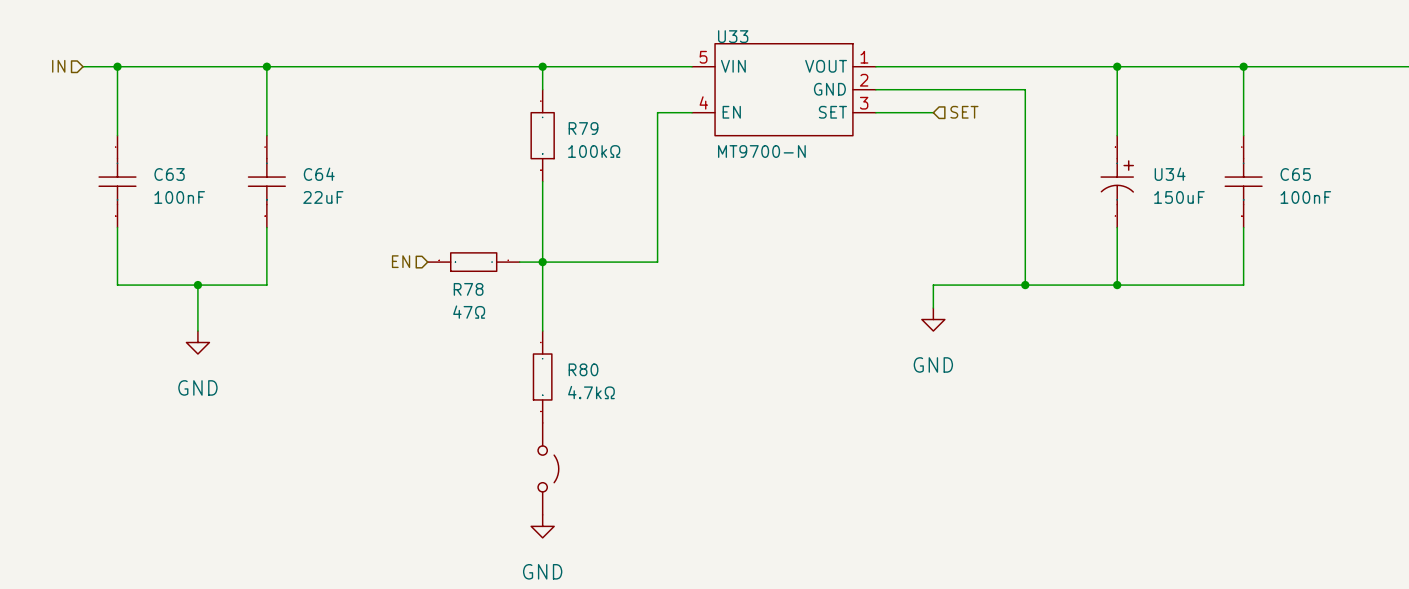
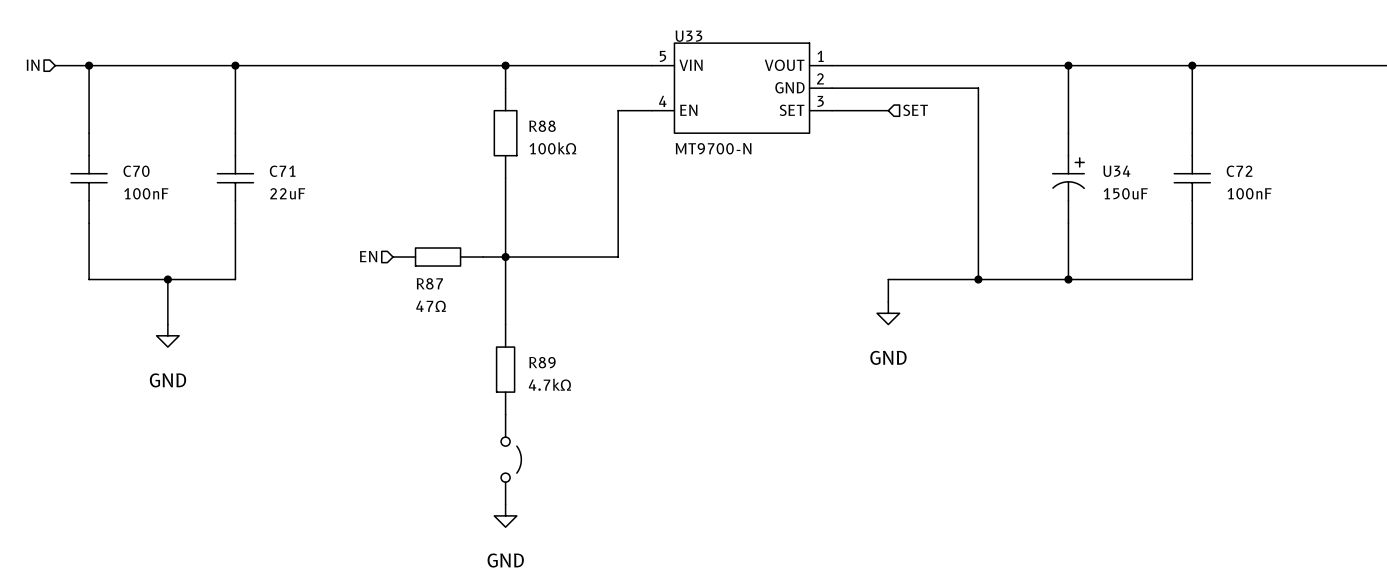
R79 name: R79 (583, 128) -> R88 (542, 126)
C63 name: C63 (169, 174) -> C70 (136, 171)
C64 name: C64 (319, 174) -> C71 (282, 171)
C65 name: C65 (1295, 174) -> C72 (1239, 171)
R78 name: R78 (468, 289) -> R87 (429, 283)
R80 name: R80 (583, 369) -> R89 (542, 362)

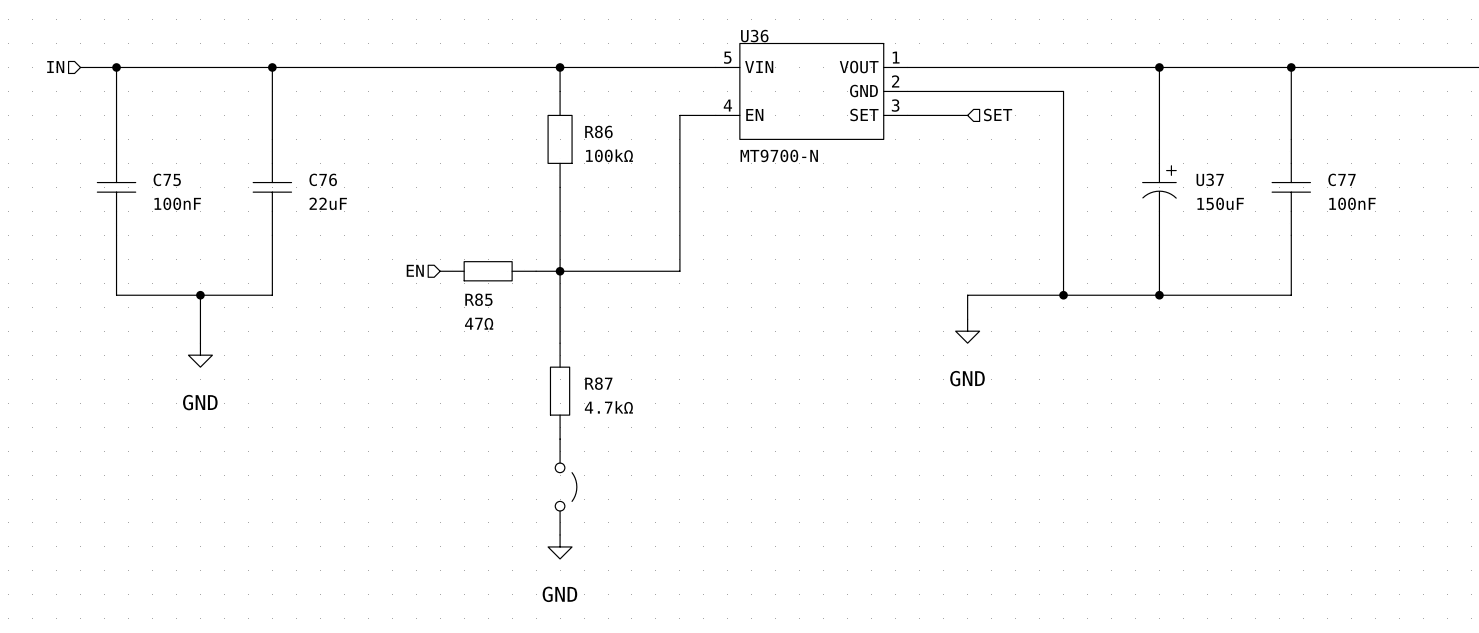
U33 name: U33 (688, 36) -> U36 (754, 36)
R88 name: R88 (542, 126) -> R86 (598, 131)
C70 name: C70 (136, 171) -> C75 (167, 179)
C71 name: C71 (282, 171) -> C76 (323, 179)
U34 name: U34 (1116, 171) -> U37 (1210, 179)
C72 name: C72 (1239, 171) -> C77 (1342, 179)
R87 name: R87 (429, 283) -> R85 (478, 299)
R89 name: R89 (542, 362) -> R87 (598, 383)

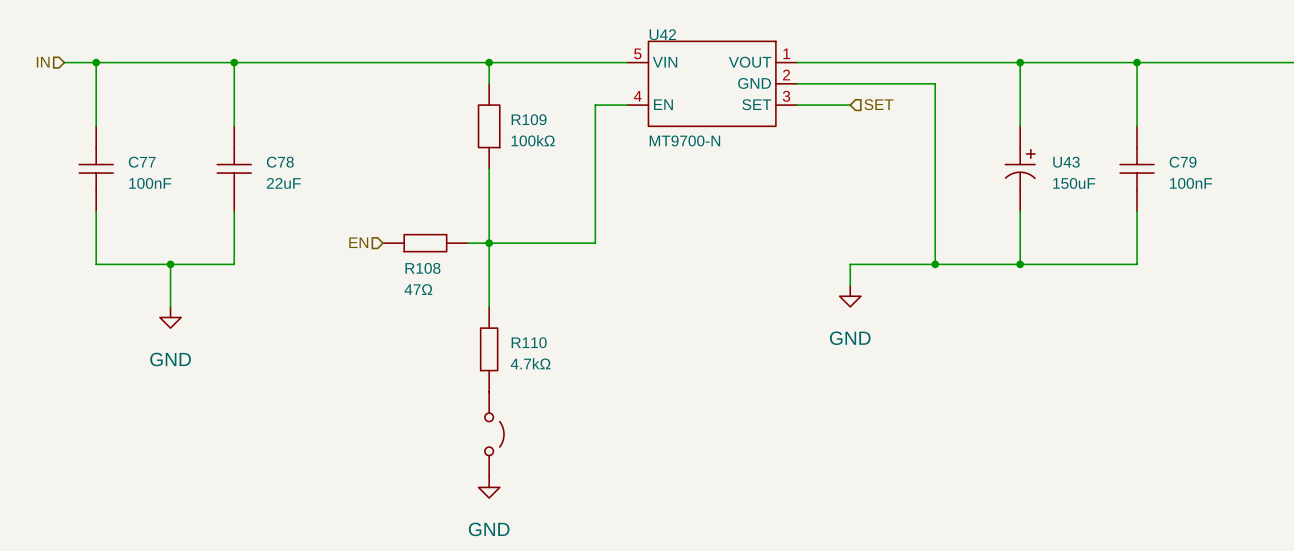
U36 name: U36 (754, 36) -> U42 (662, 34)
R86 name: R86 (598, 131) -> R109 (529, 119)
C75 name: C75 (167, 179) -> C77 (142, 162)
C76 name: C76 (323, 179) -> C78 (280, 162)
U37 name: U37 (1210, 179) -> U43 (1066, 162)
C77 name: C77 (1342, 179) -> C79 (1183, 162)
R85 name: R85 (478, 299) -> R108 (422, 268)
R87 name: R87 (598, 383) -> R110 (529, 342)

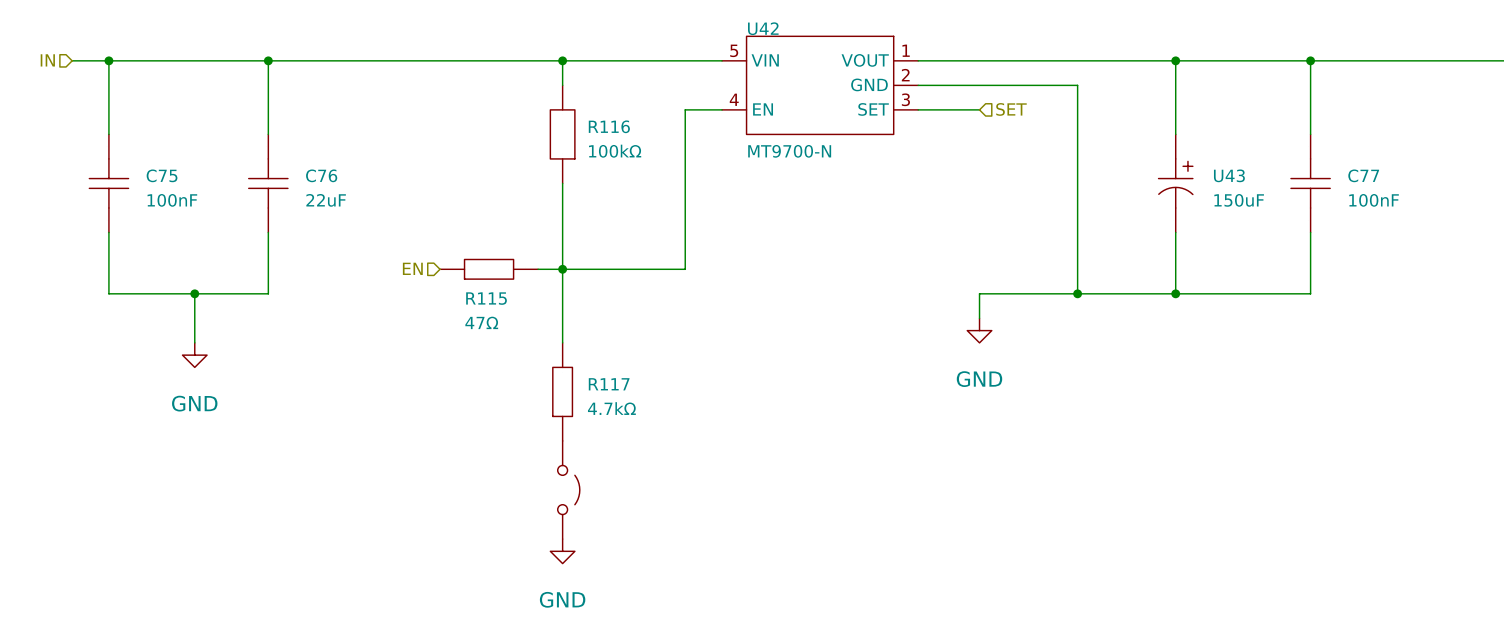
R109 name: R109 (529, 119) -> R116 (609, 126)
C77 name: C77 (142, 162) -> C75 (162, 175)
C78 name: C78 (280, 162) -> C76 (321, 175)
C79 name: C79 (1183, 162) -> C77 (1363, 175)
R108 name: R108 (422, 268) -> R115 (486, 298)
R110 name: R110 (529, 342) -> R117 (609, 384)

